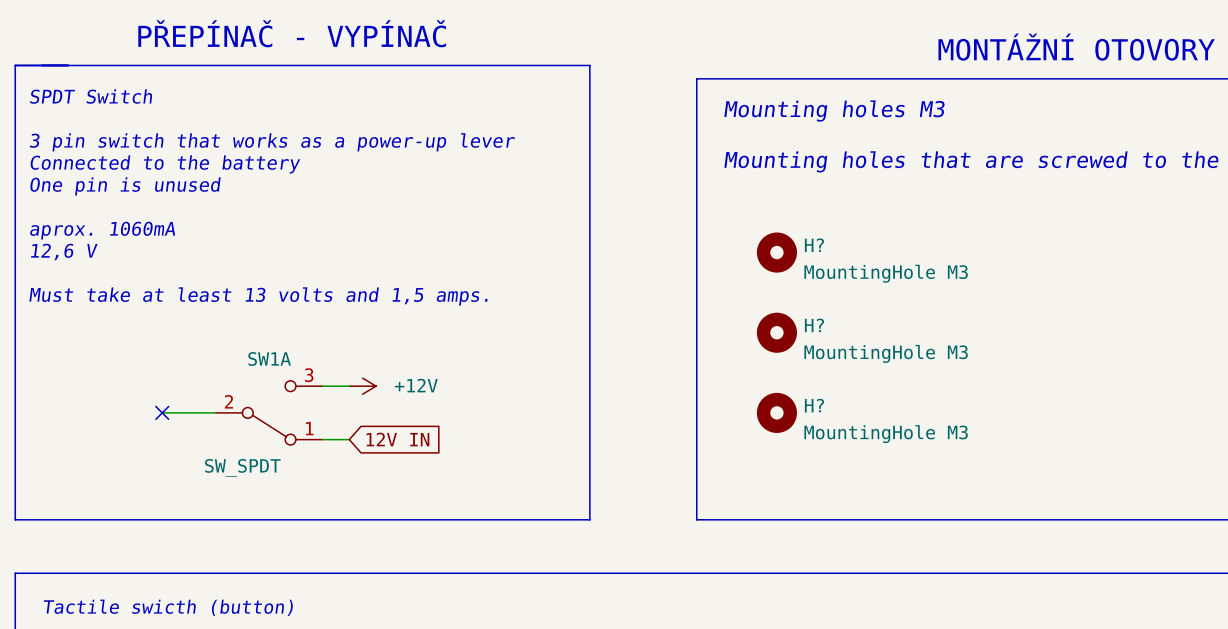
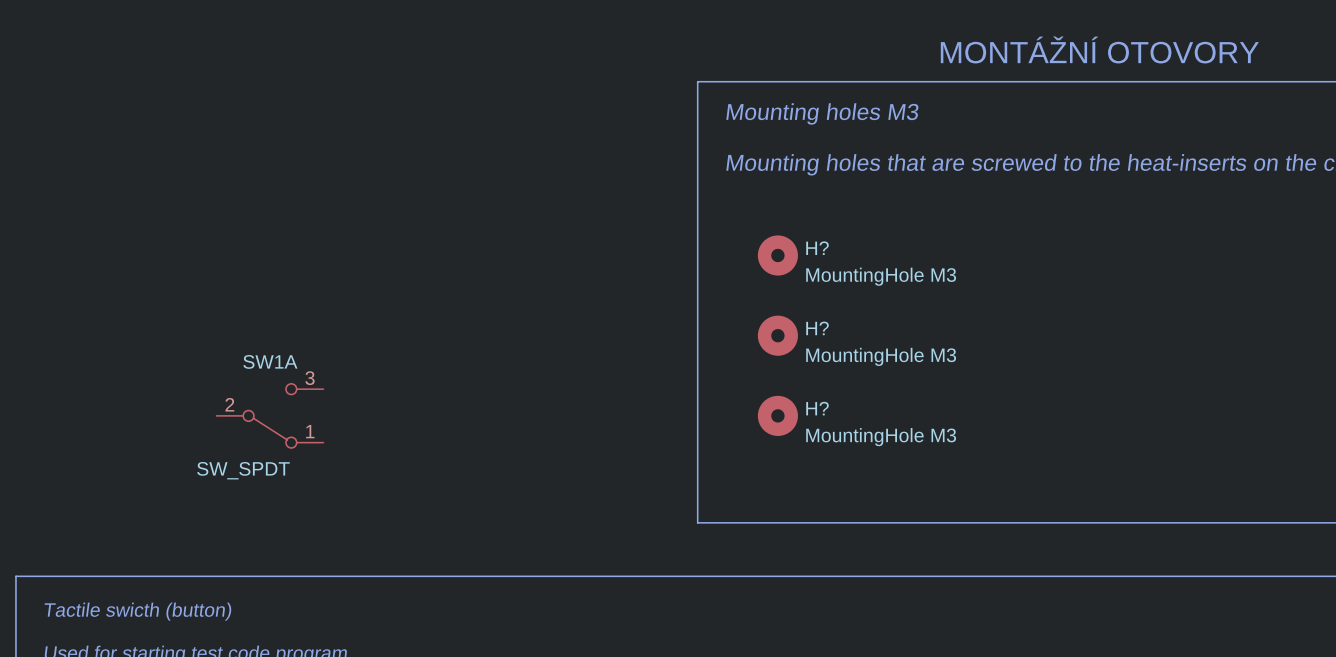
text: PŘEPÍNAČ - VYPÍNAČ (292, 33) -> none
line: (15, 65) (15, 519) (589, 519) (589, 65) (15, 65) -> none
text: SPDT Switch (91, 96) -> none
text: 3 pin switch that works as a power-up lever (272, 142) -> none
text: Connected to the battery (165, 164) -> none
text: One pin is unused (125, 186) -> none
text: aprox. 1060mA (102, 230) -> none
text: 12,6 V (64, 252) -> none
text: Must take at least 13 volts and 1,5 amps. (258, 296) -> none
wire: (322, 386) (349, 386) -> none
power symbol: +12V (362, 386) -> none
wire: (162, 412) (215, 412) -> none
no-connect mark: (162, 412) -> none
wire: (322, 439) (349, 439) -> none
global label: 12V IN (397, 439) -> none

